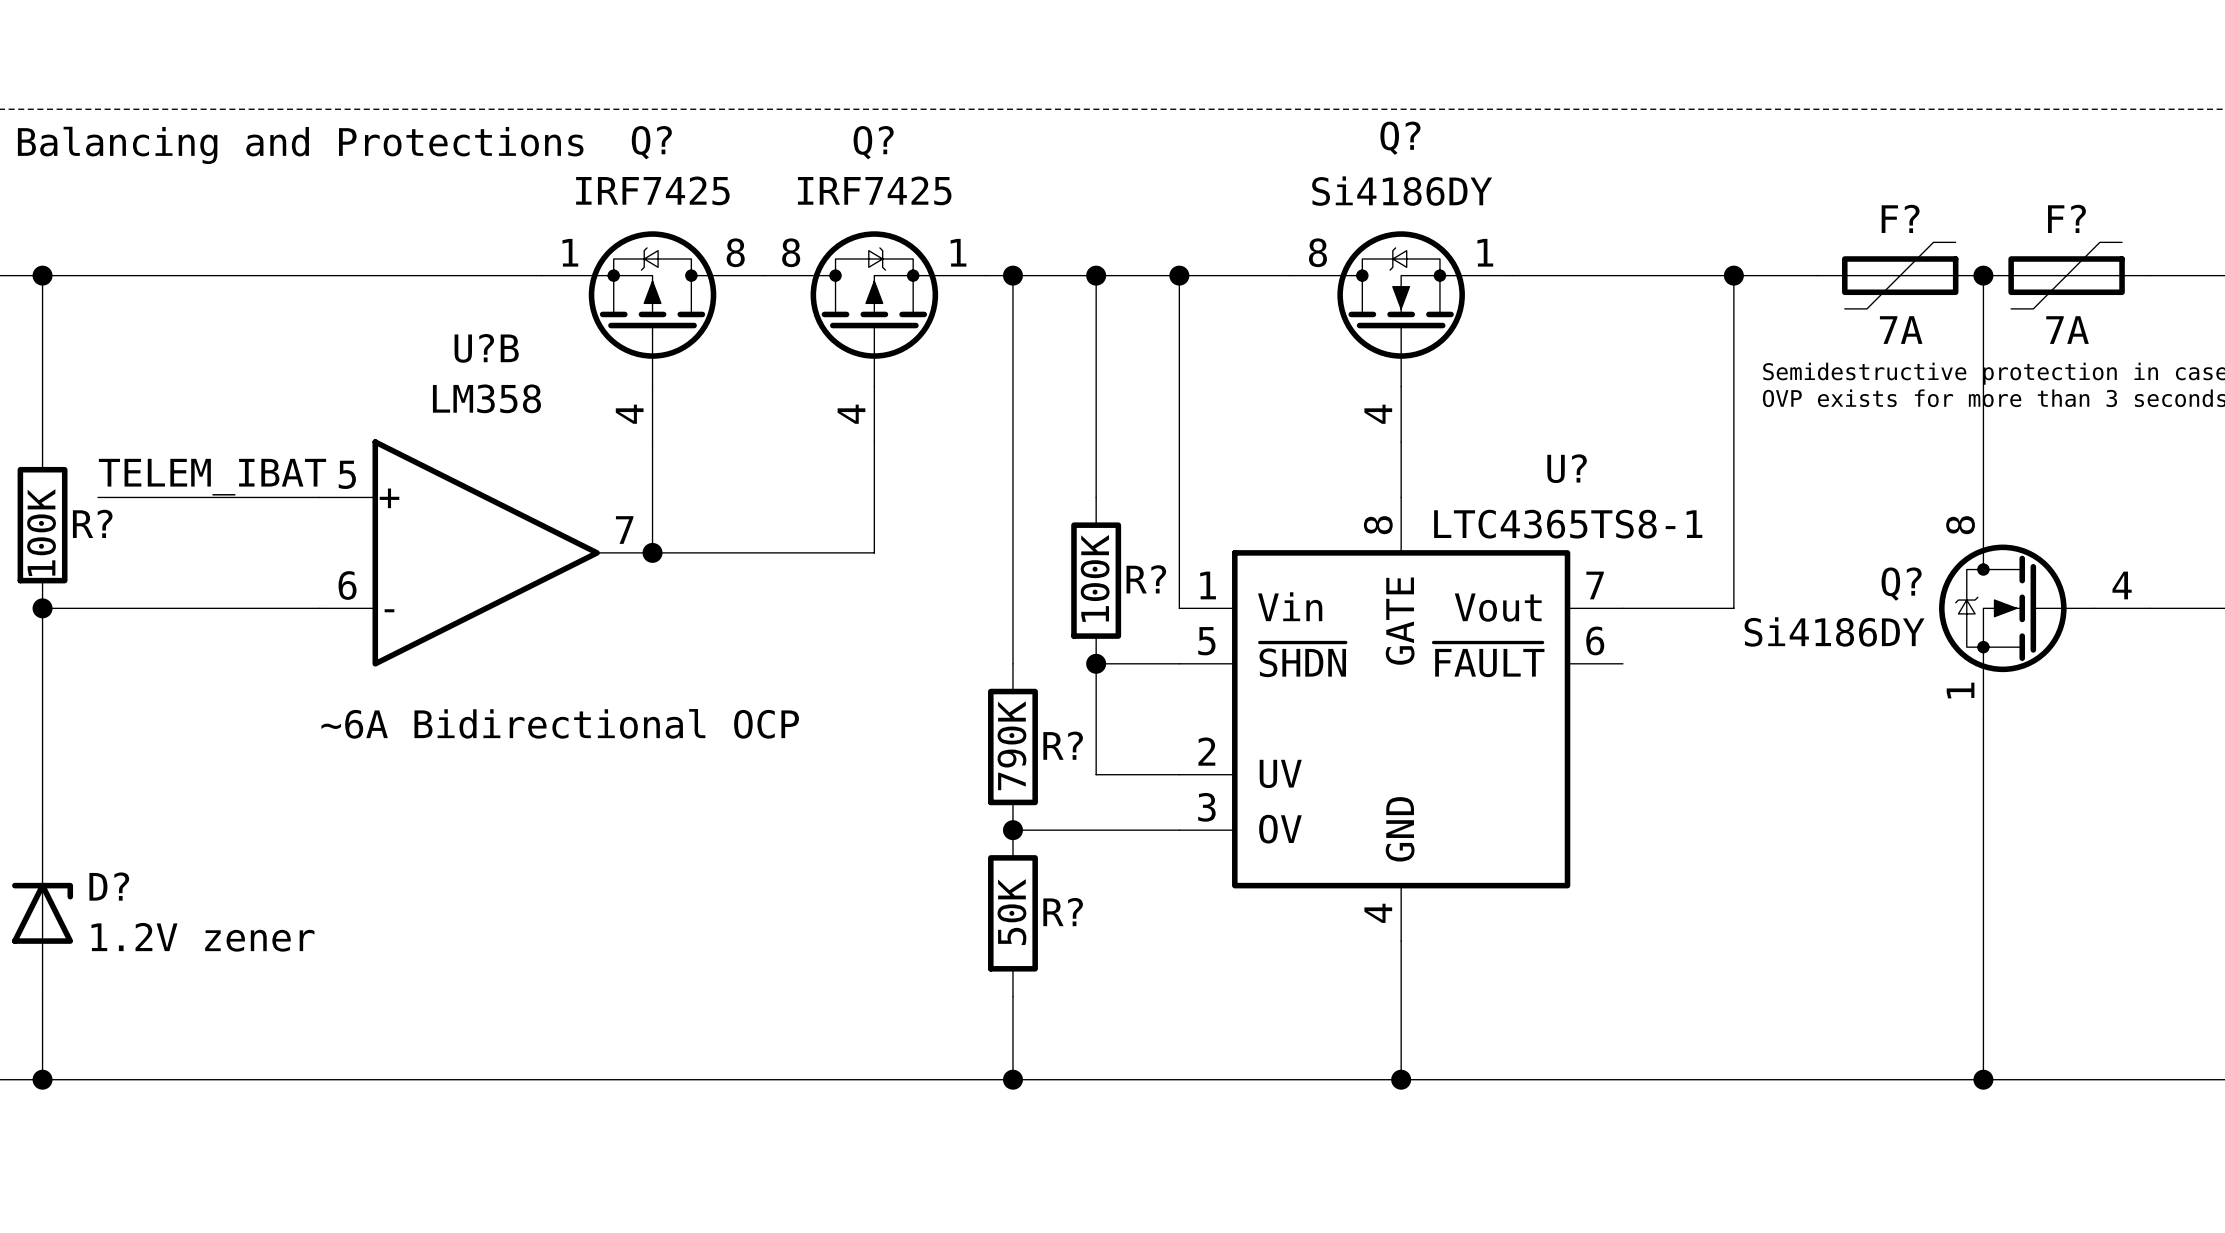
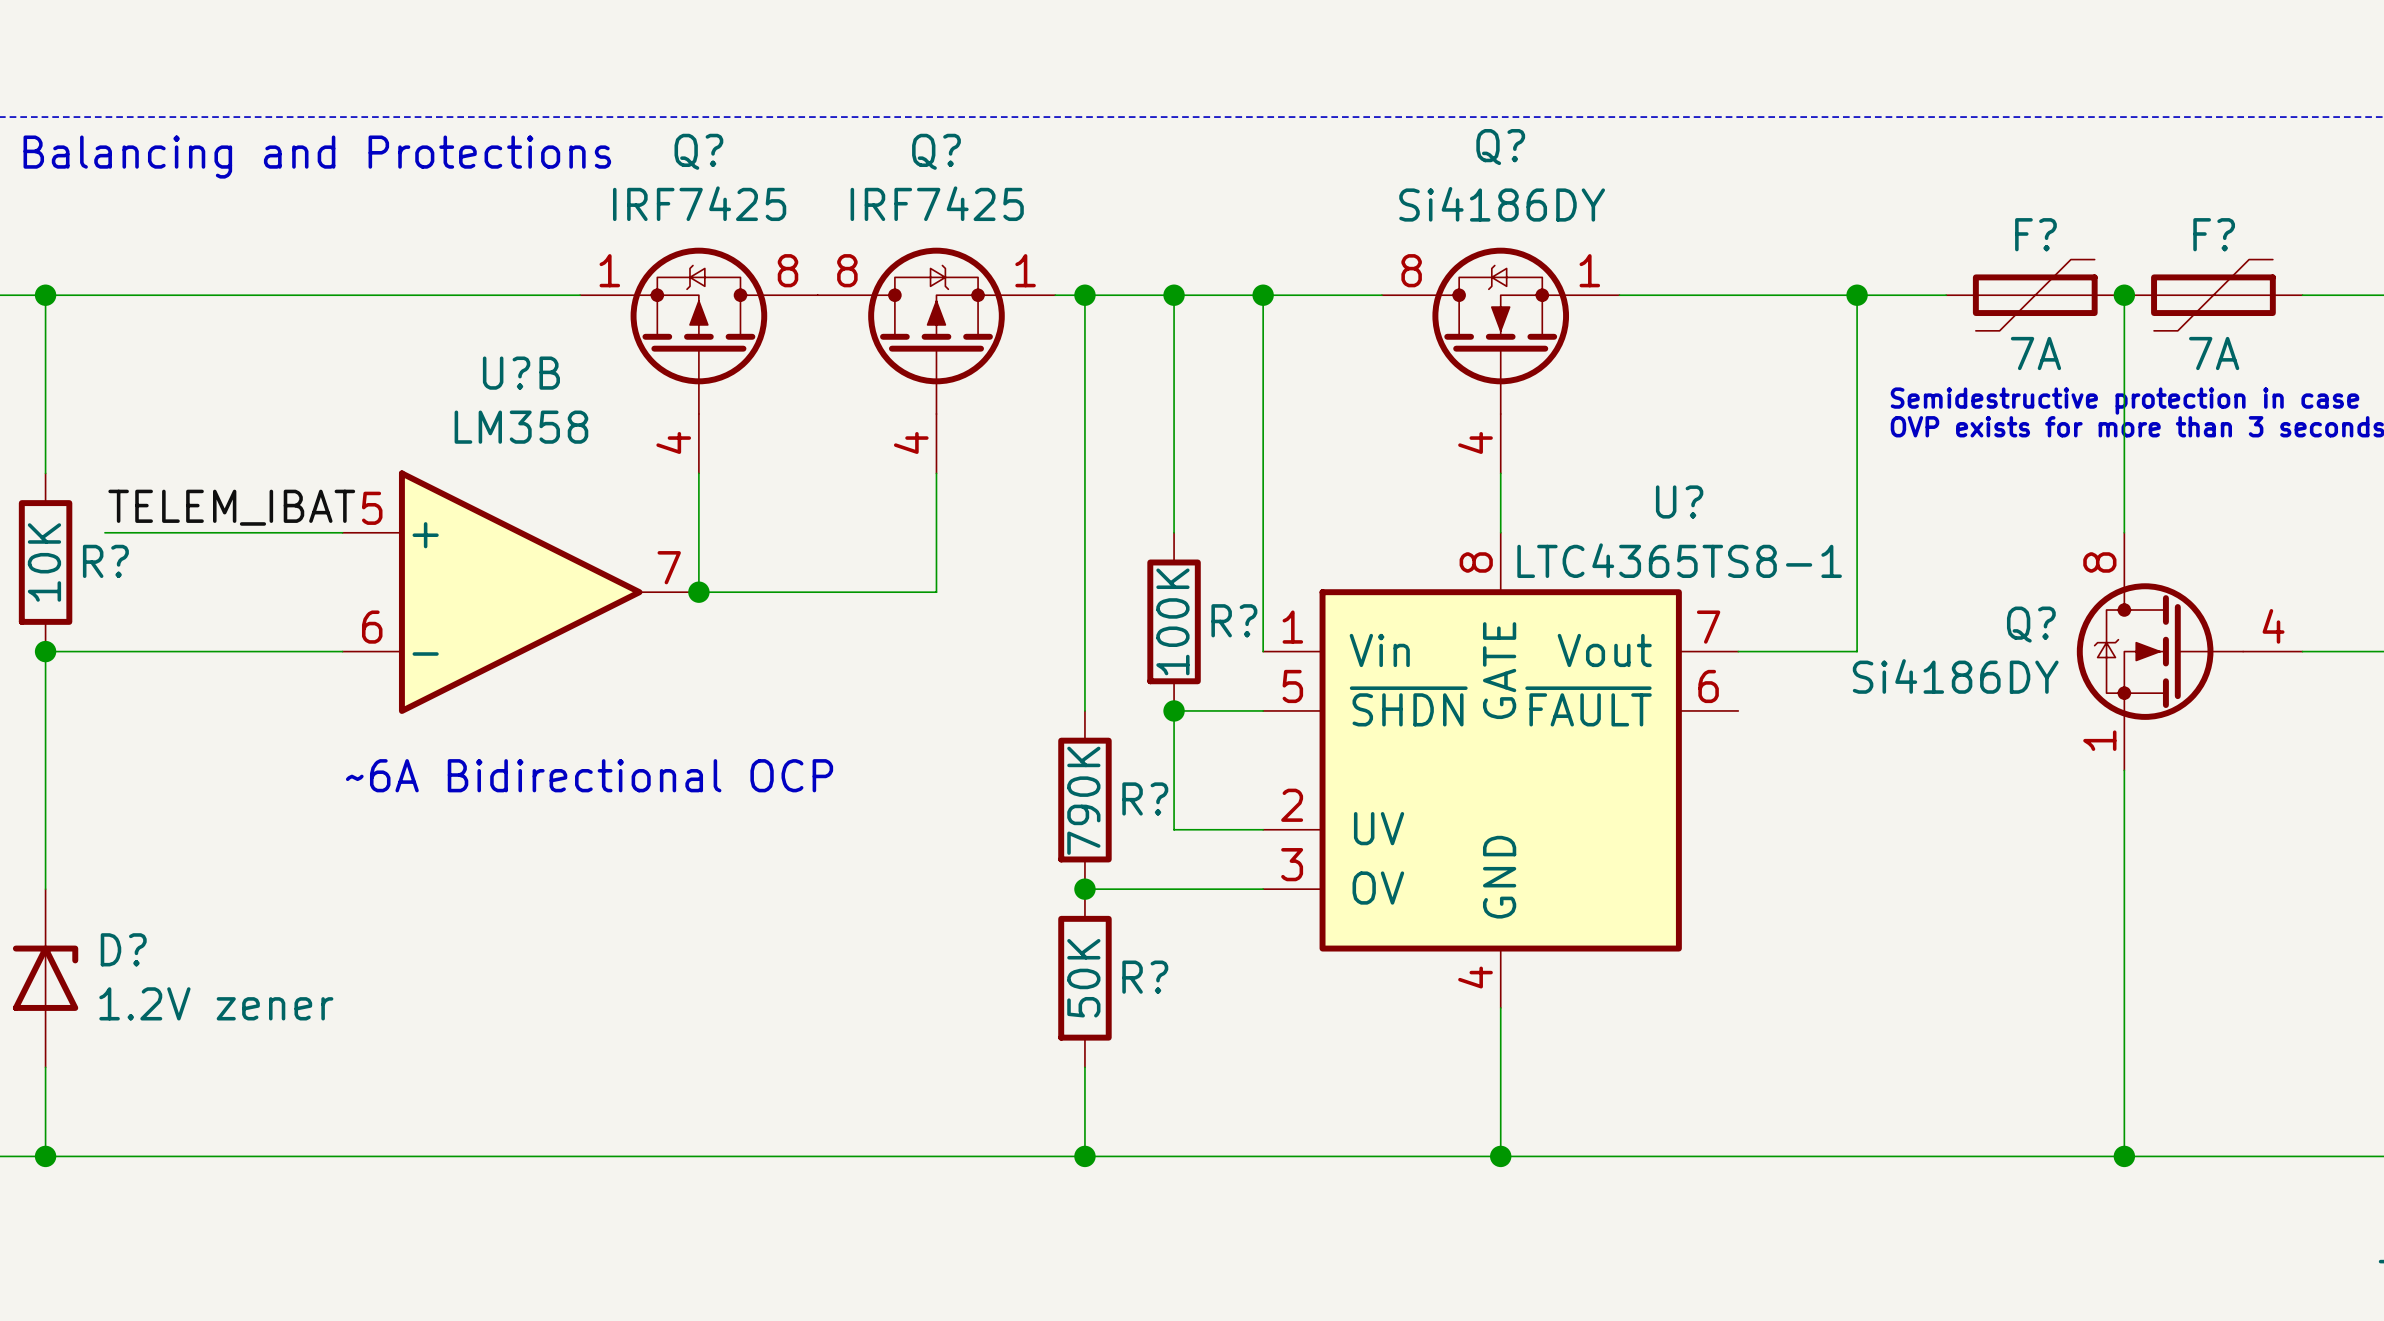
R? value: 100K (41, 532) -> 10K (44, 562)

